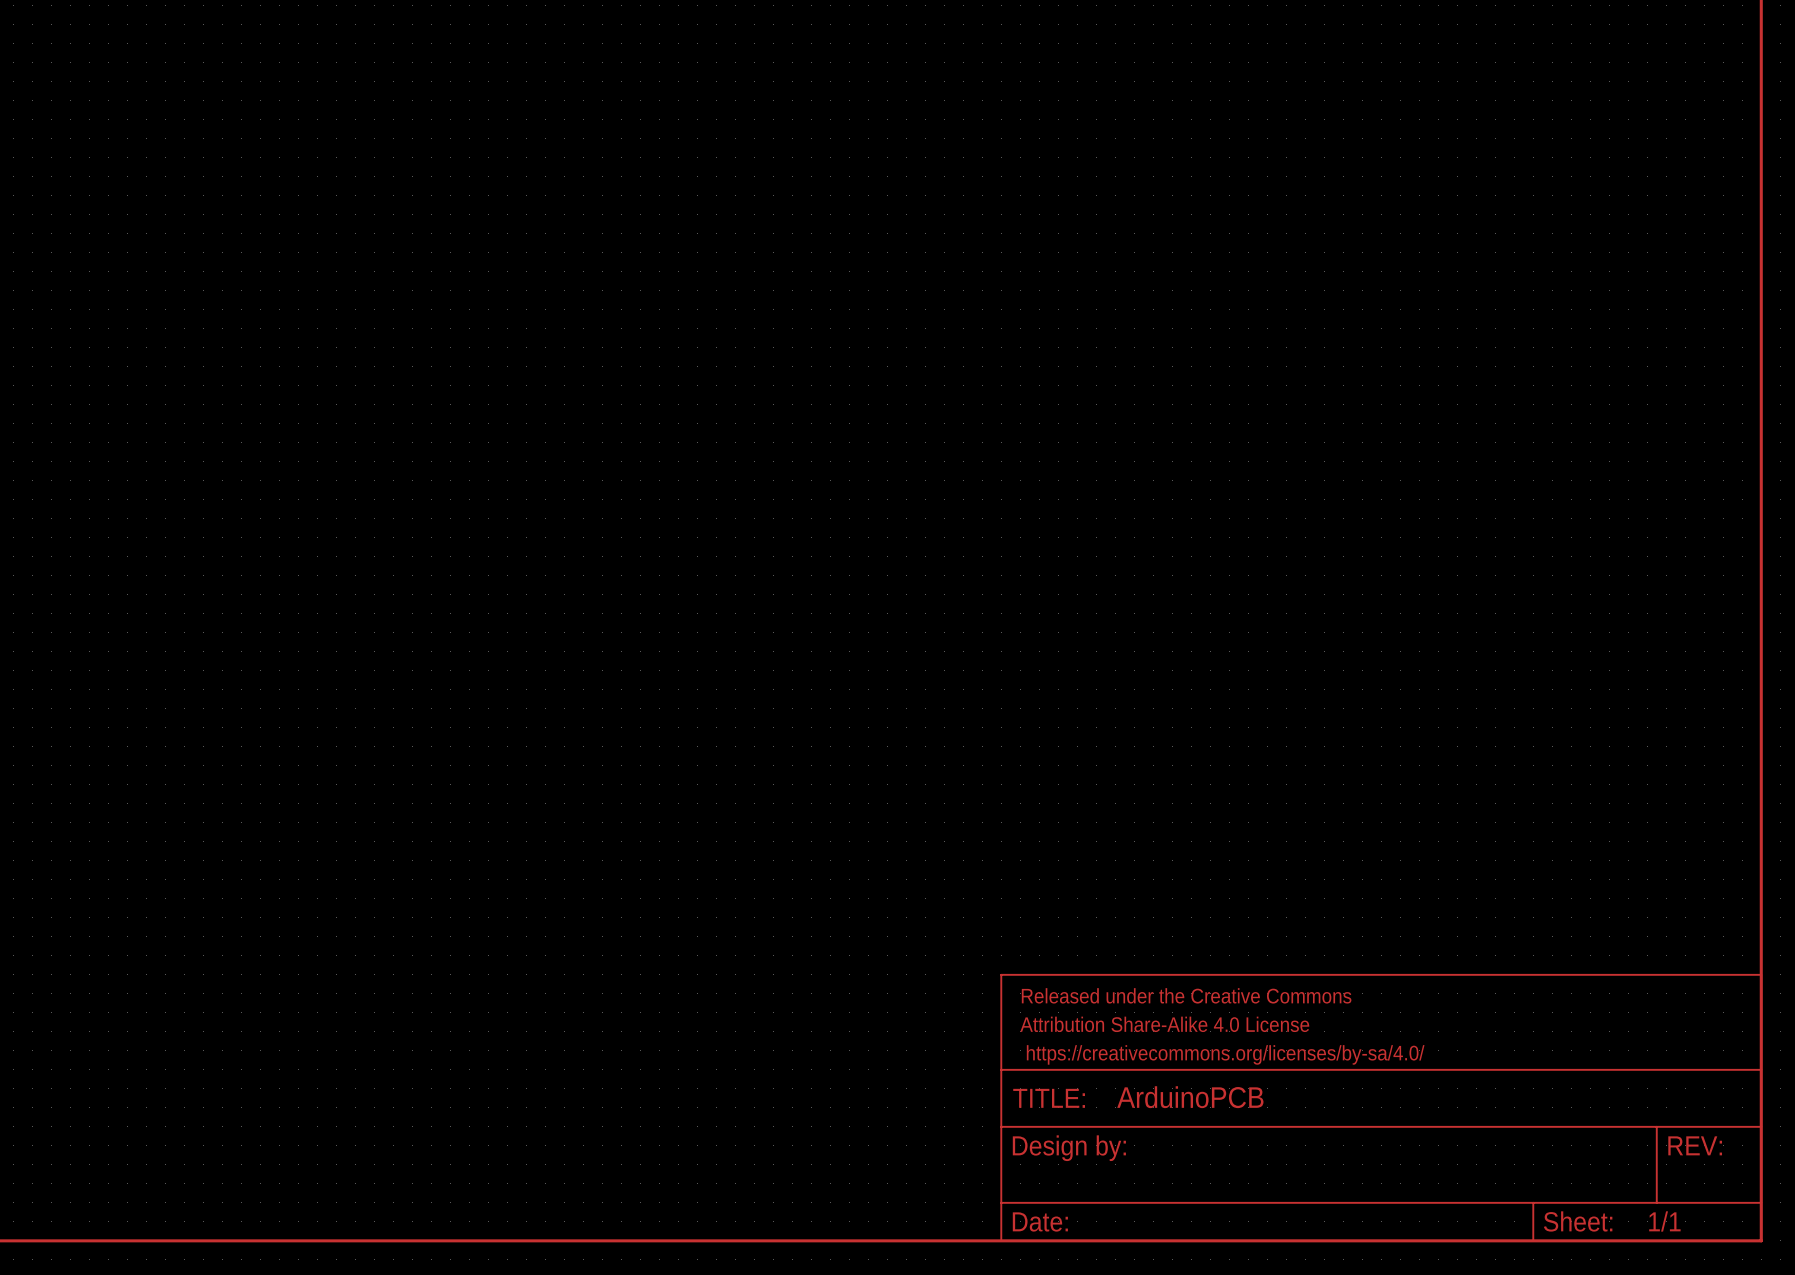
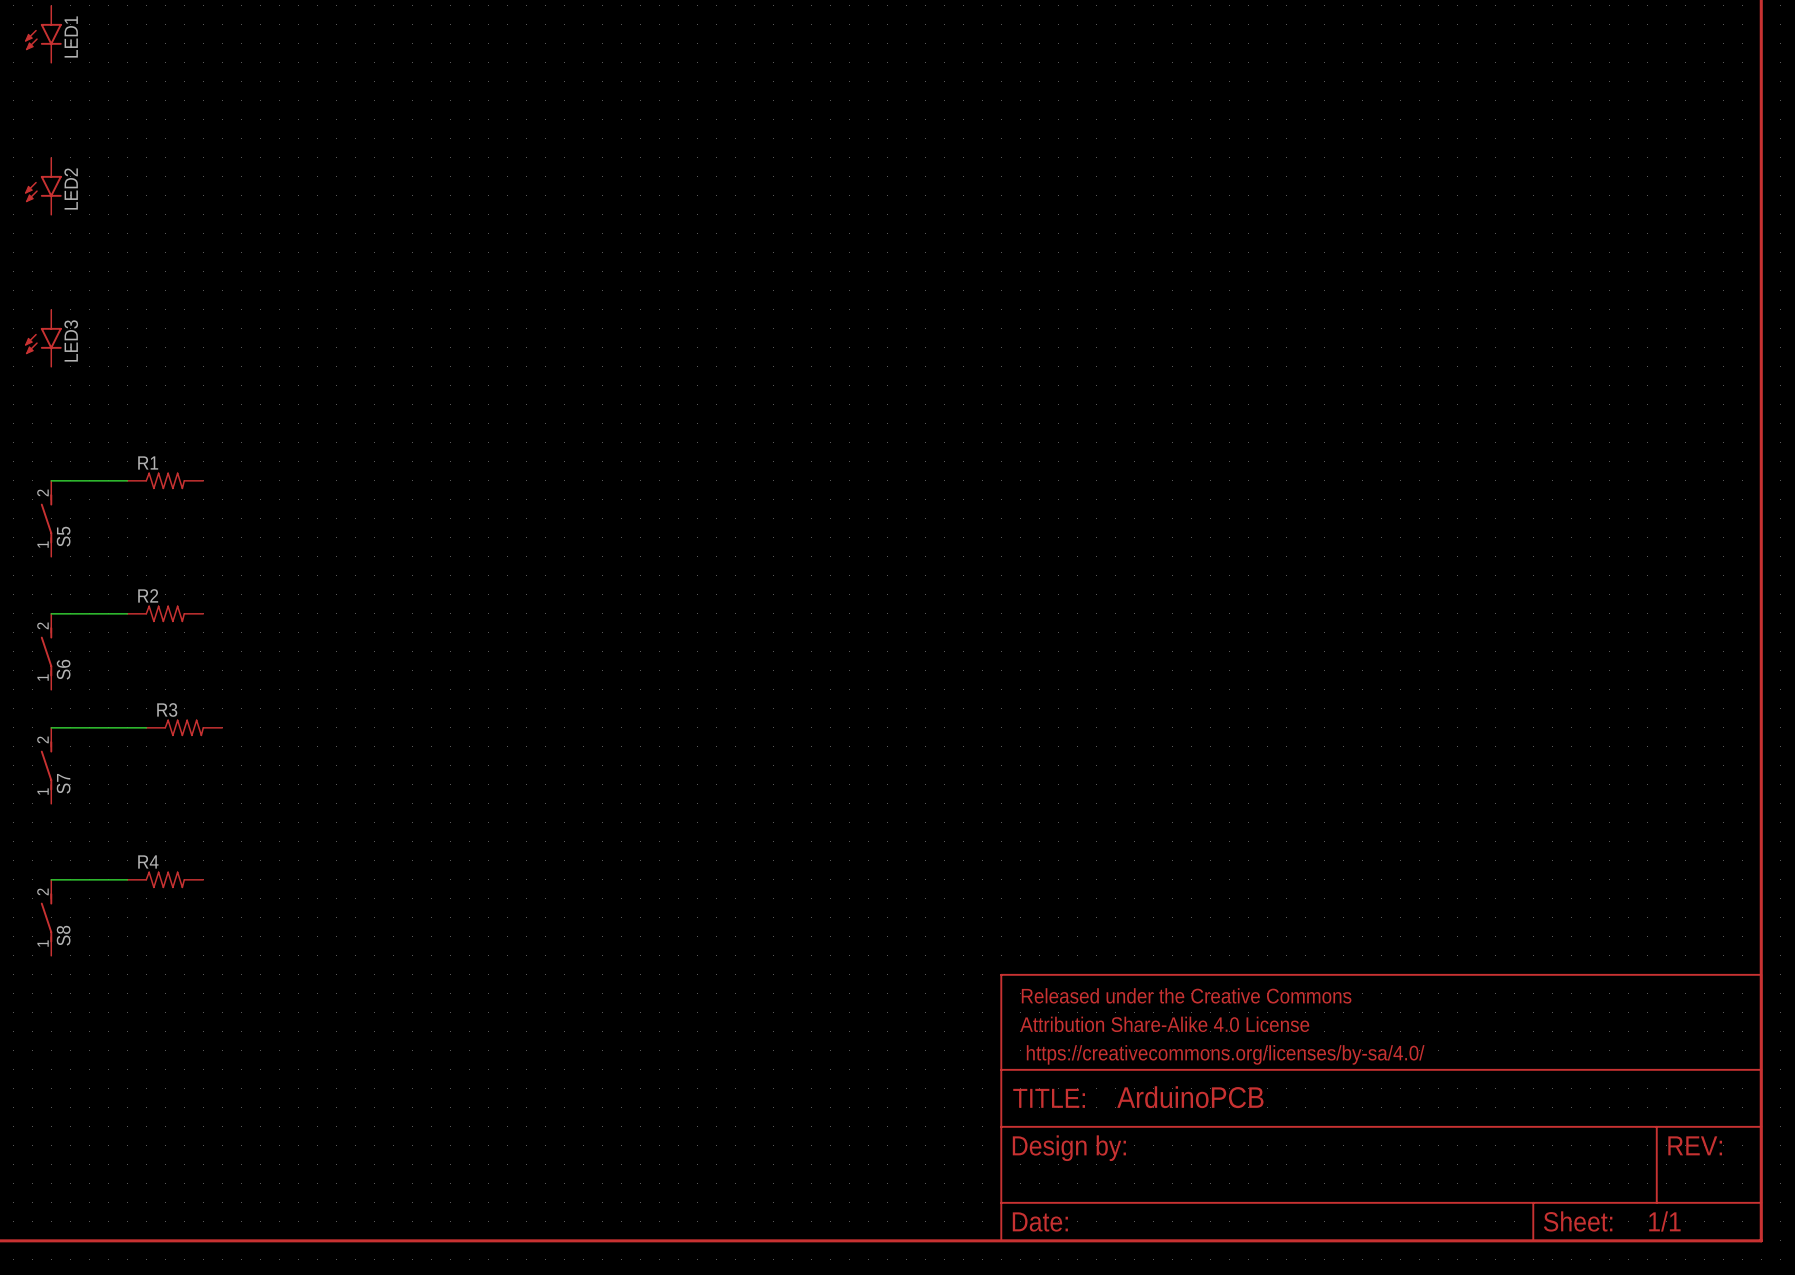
LED1: none -> (43, 34)
LED2: none -> (43, 186)
LED3: none -> (43, 338)
wire: none -> (51, 480) (127, 480)
R1: none -> (165, 480)
S5: none -> (46, 518)
wire: none -> (51, 613) (127, 613)
R2: none -> (165, 613)
S6: none -> (46, 651)
wire: none -> (51, 727) (146, 727)
R3: none -> (184, 727)
S7: none -> (46, 765)
wire: none -> (51, 879) (127, 879)
R4: none -> (165, 879)
S8: none -> (46, 917)

